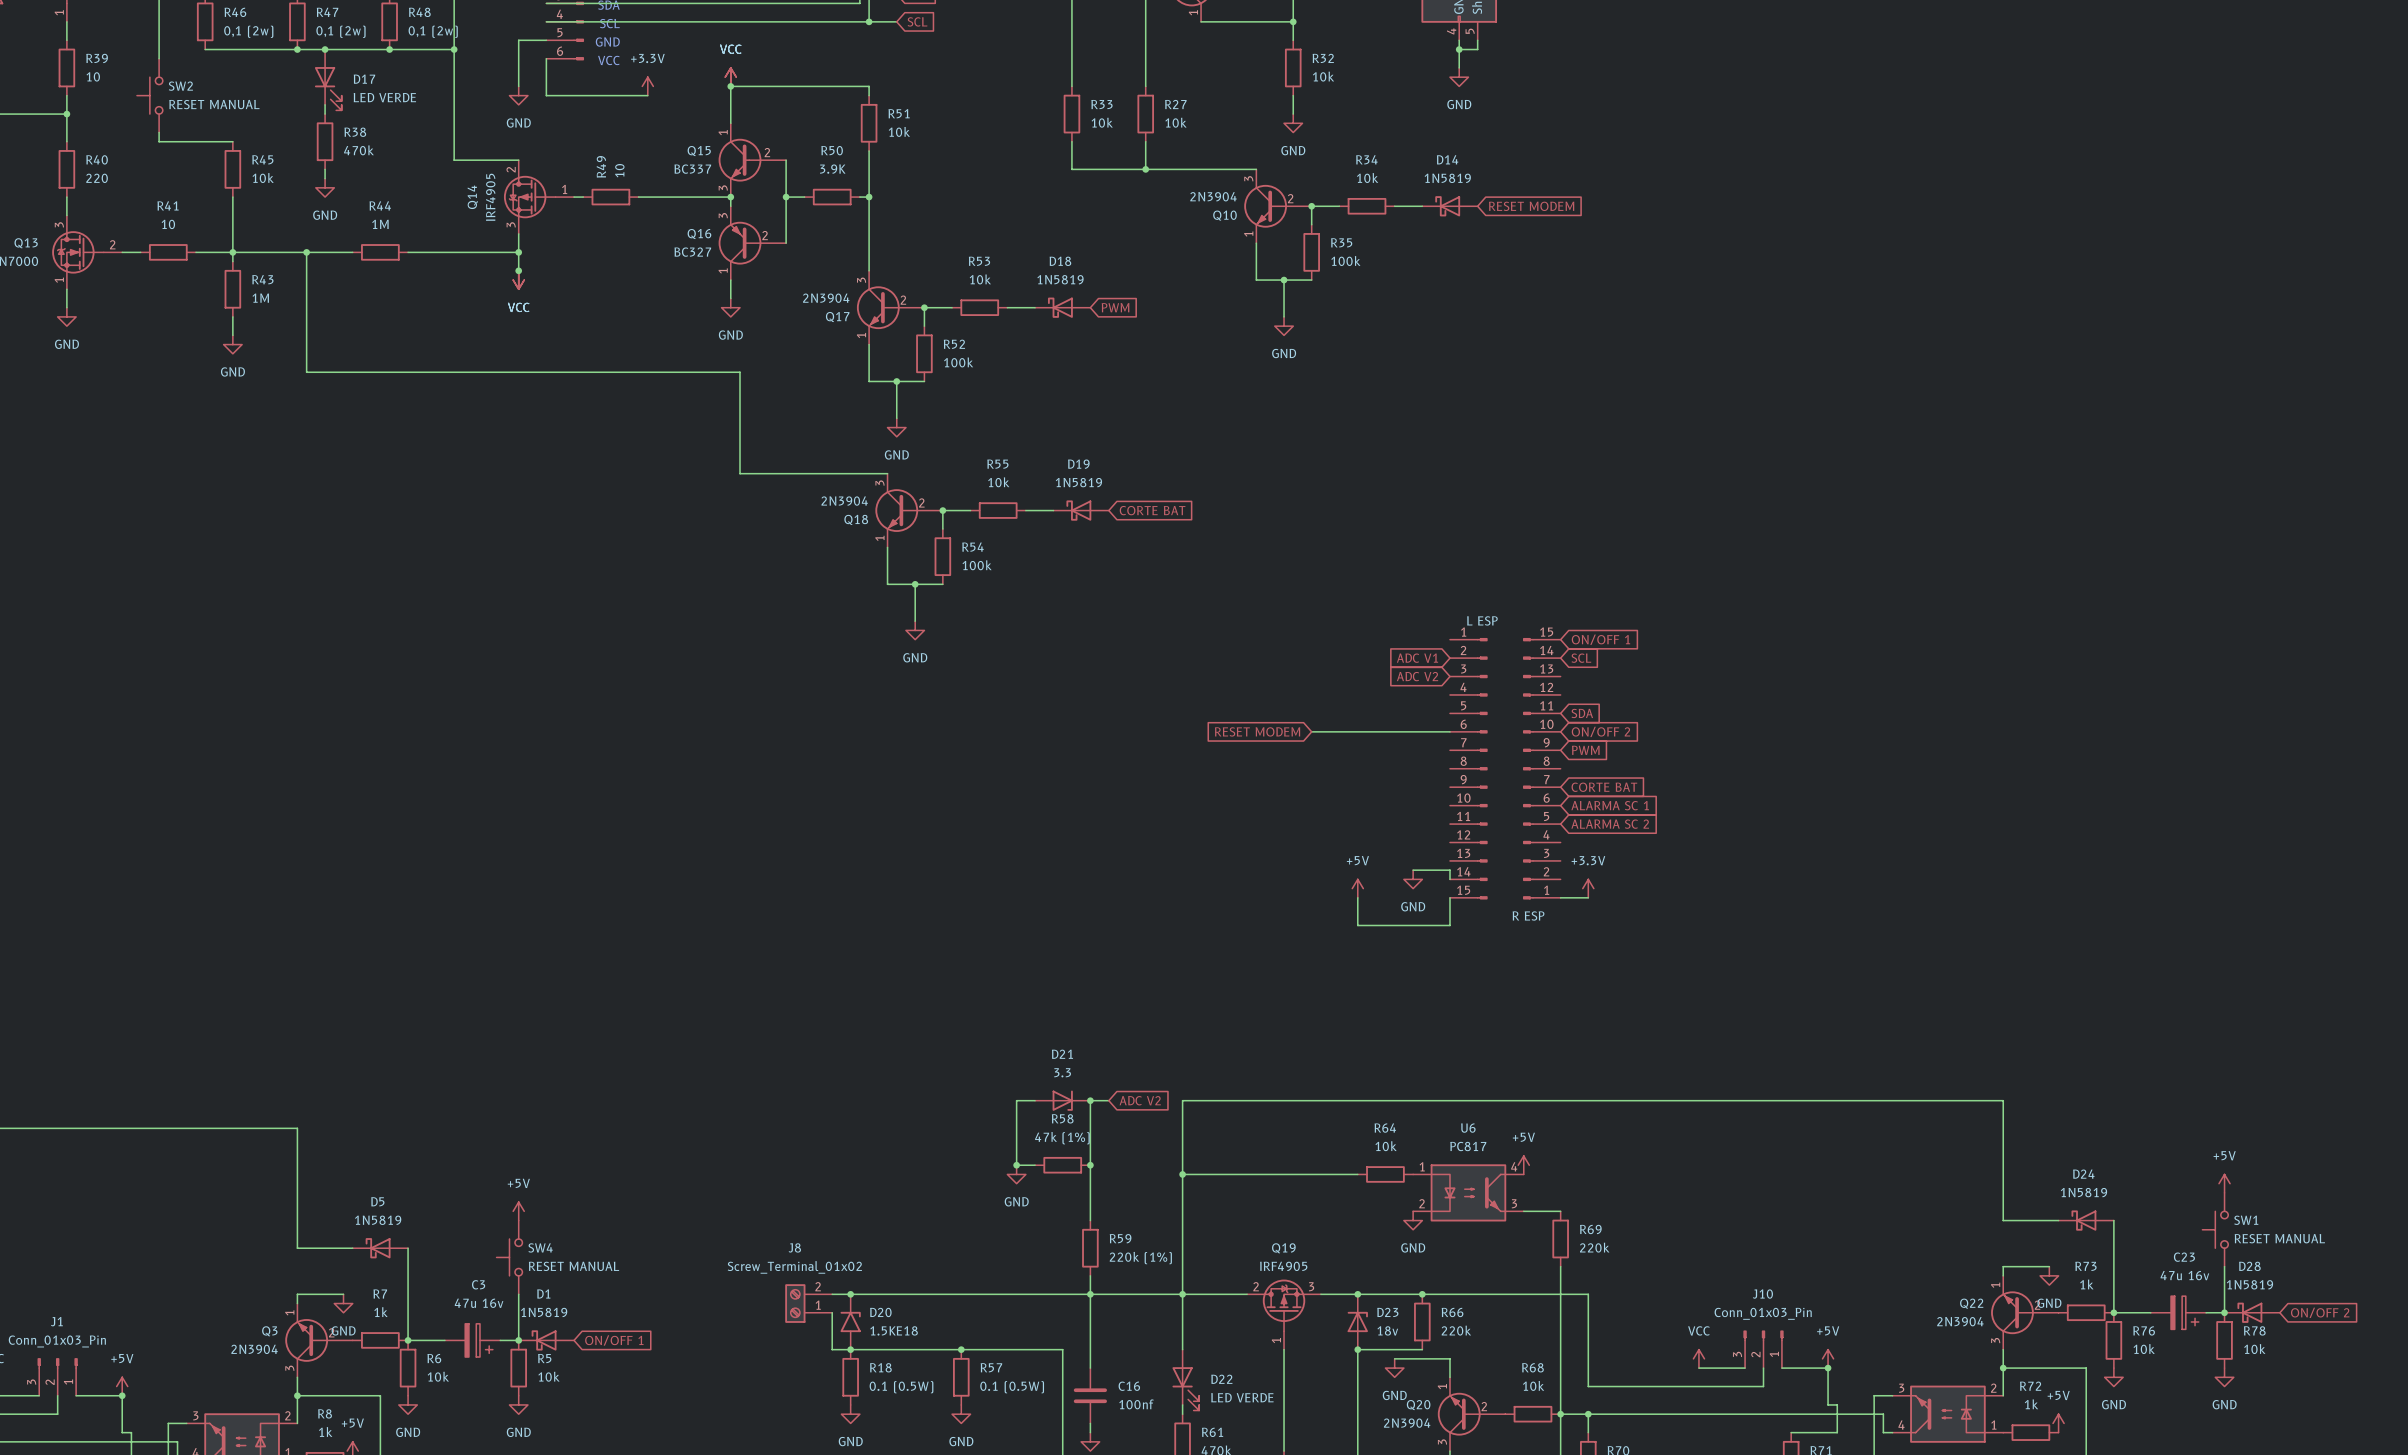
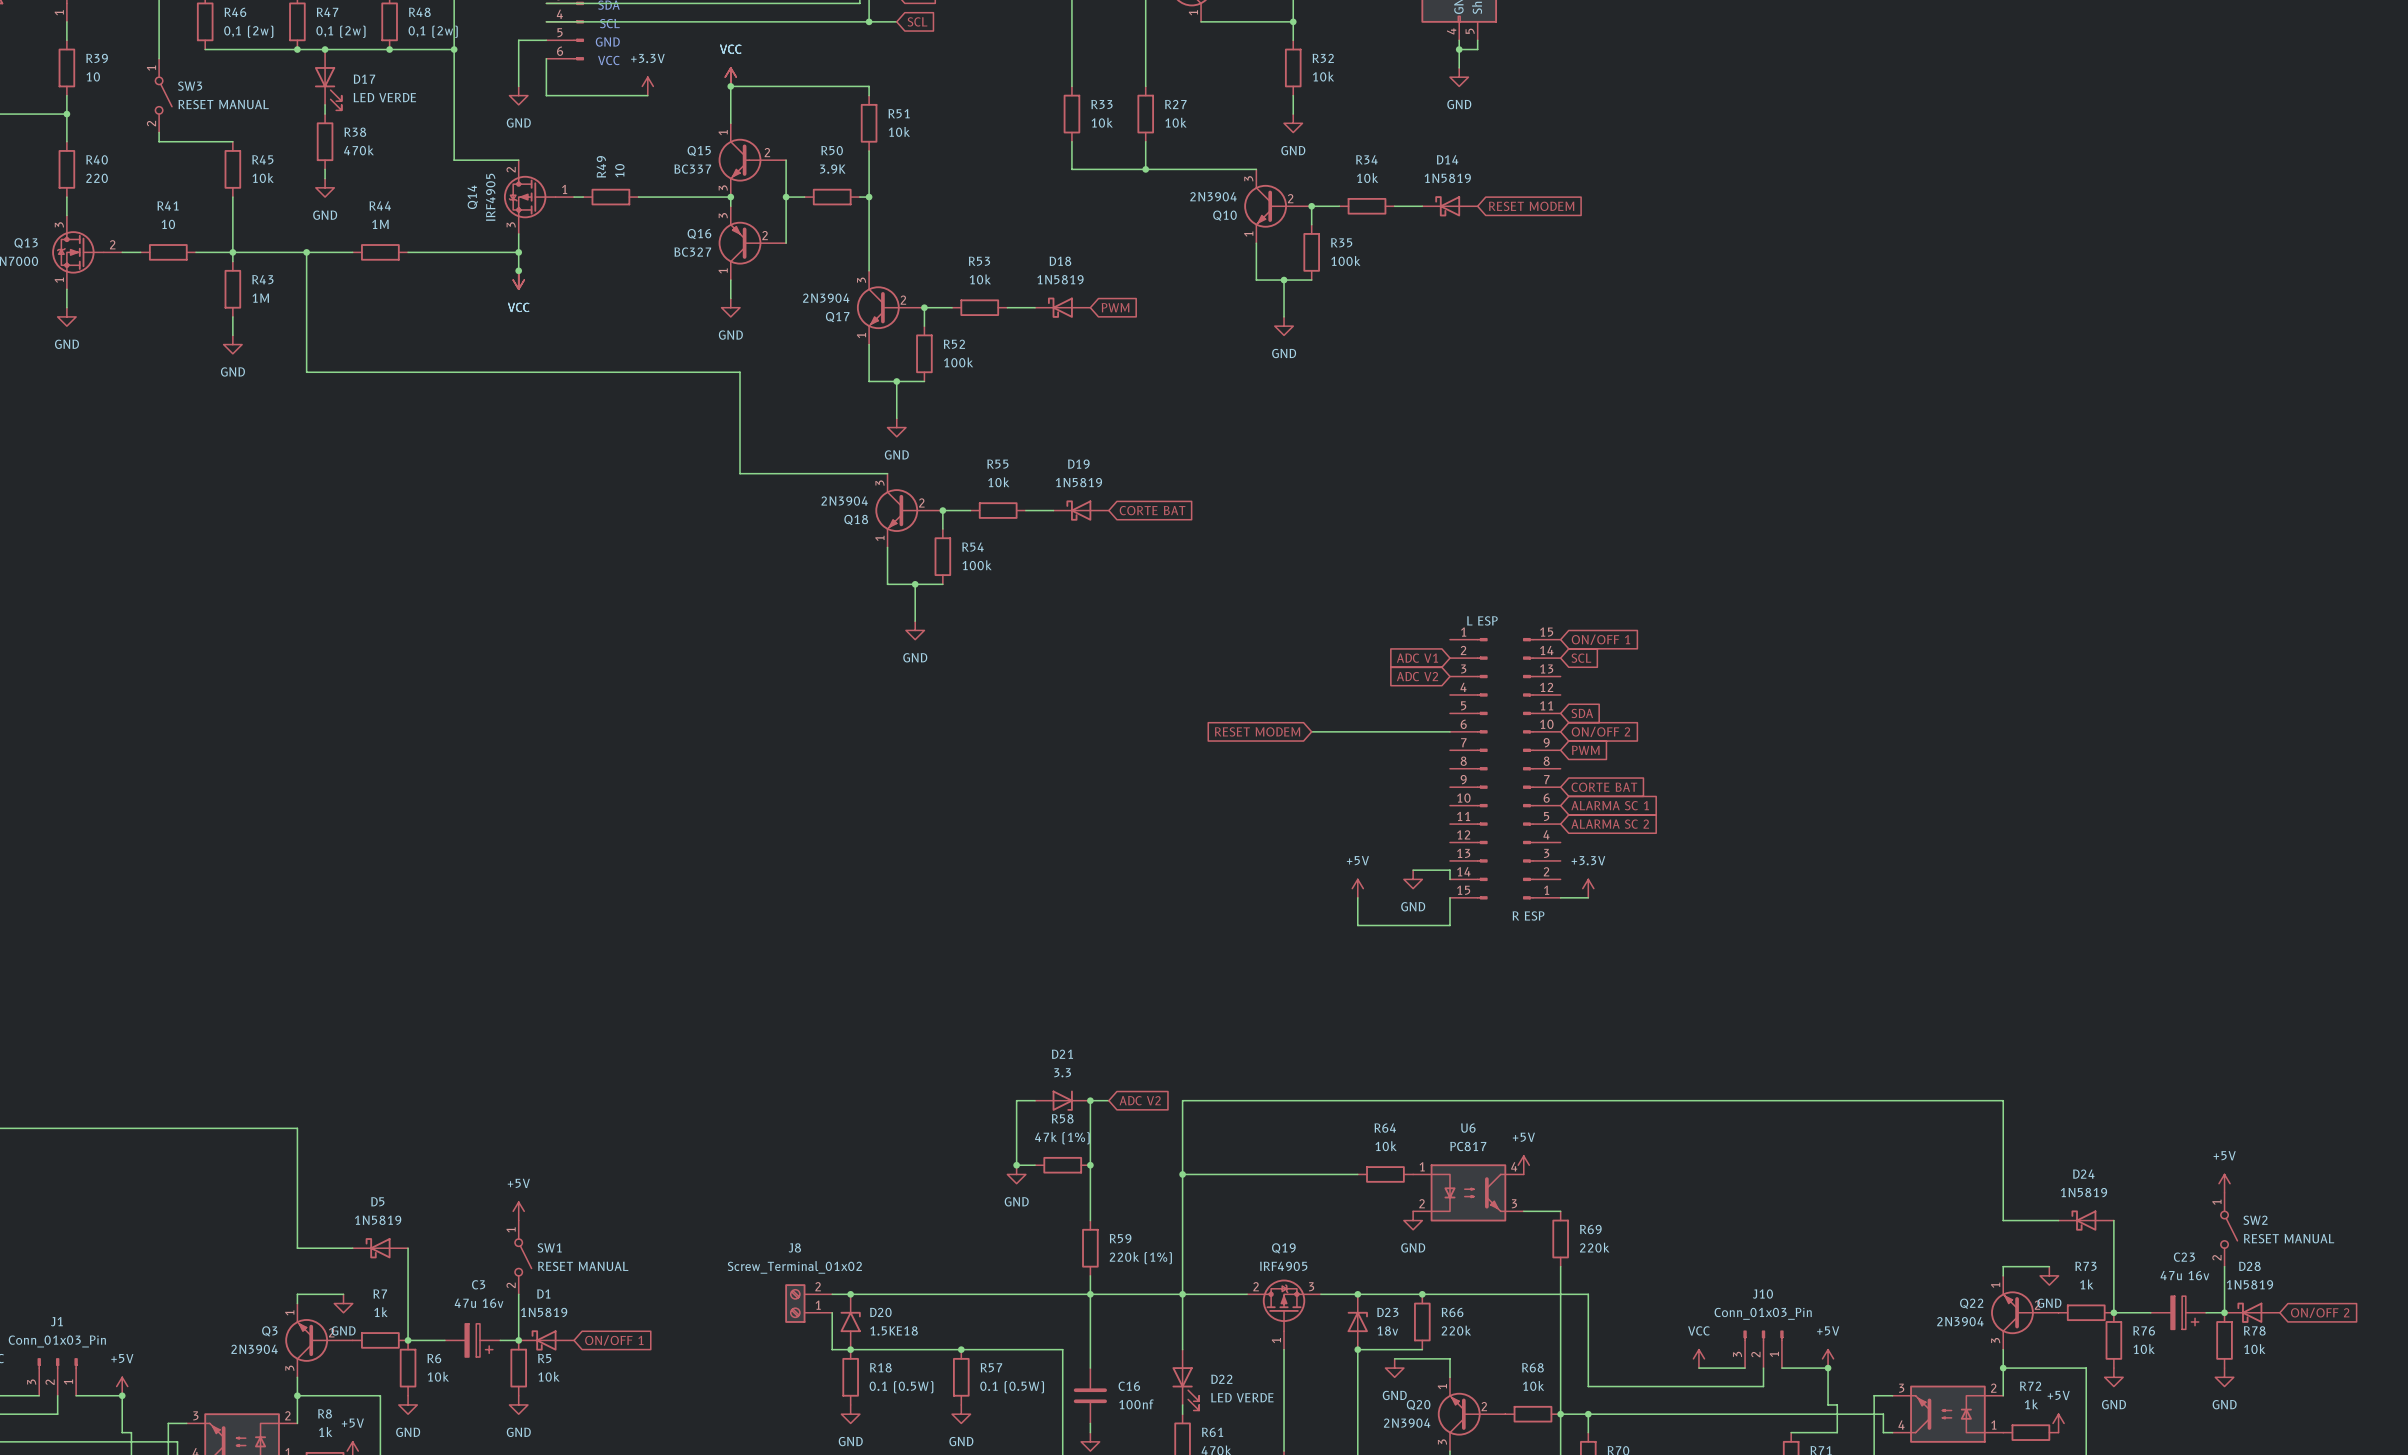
SW2 symbol: [136, 58, 163, 133] -> [2220, 1192, 2238, 1267]
SW3: none -> RESET MANUAL (163, 95)
SW1 symbol: [2202, 1192, 2229, 1267] -> [515, 1220, 532, 1295]
SW4: RESET MANUAL (509, 1257) -> none

